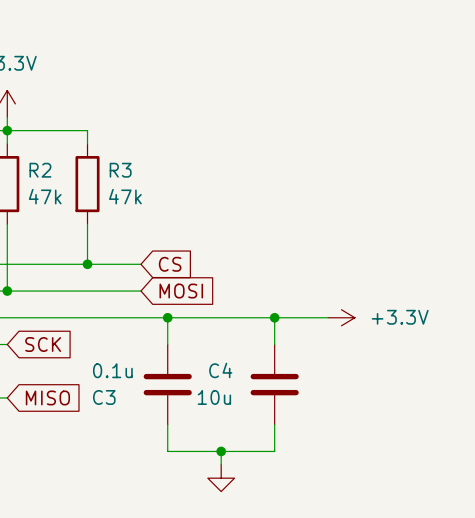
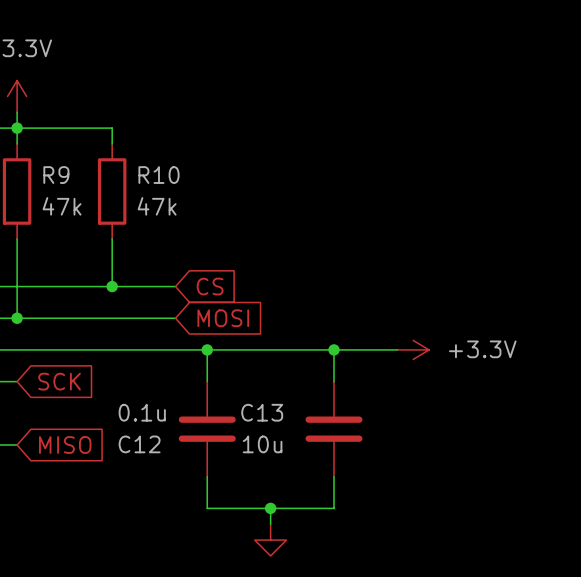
R2 name: R2 (40, 170) -> R9 (56, 175)
R3 name: R3 (120, 170) -> R10 (159, 175)
C4 name: C4 (220, 370) -> C13 (262, 412)
C3 name: C3 (104, 397) -> C12 (139, 444)

